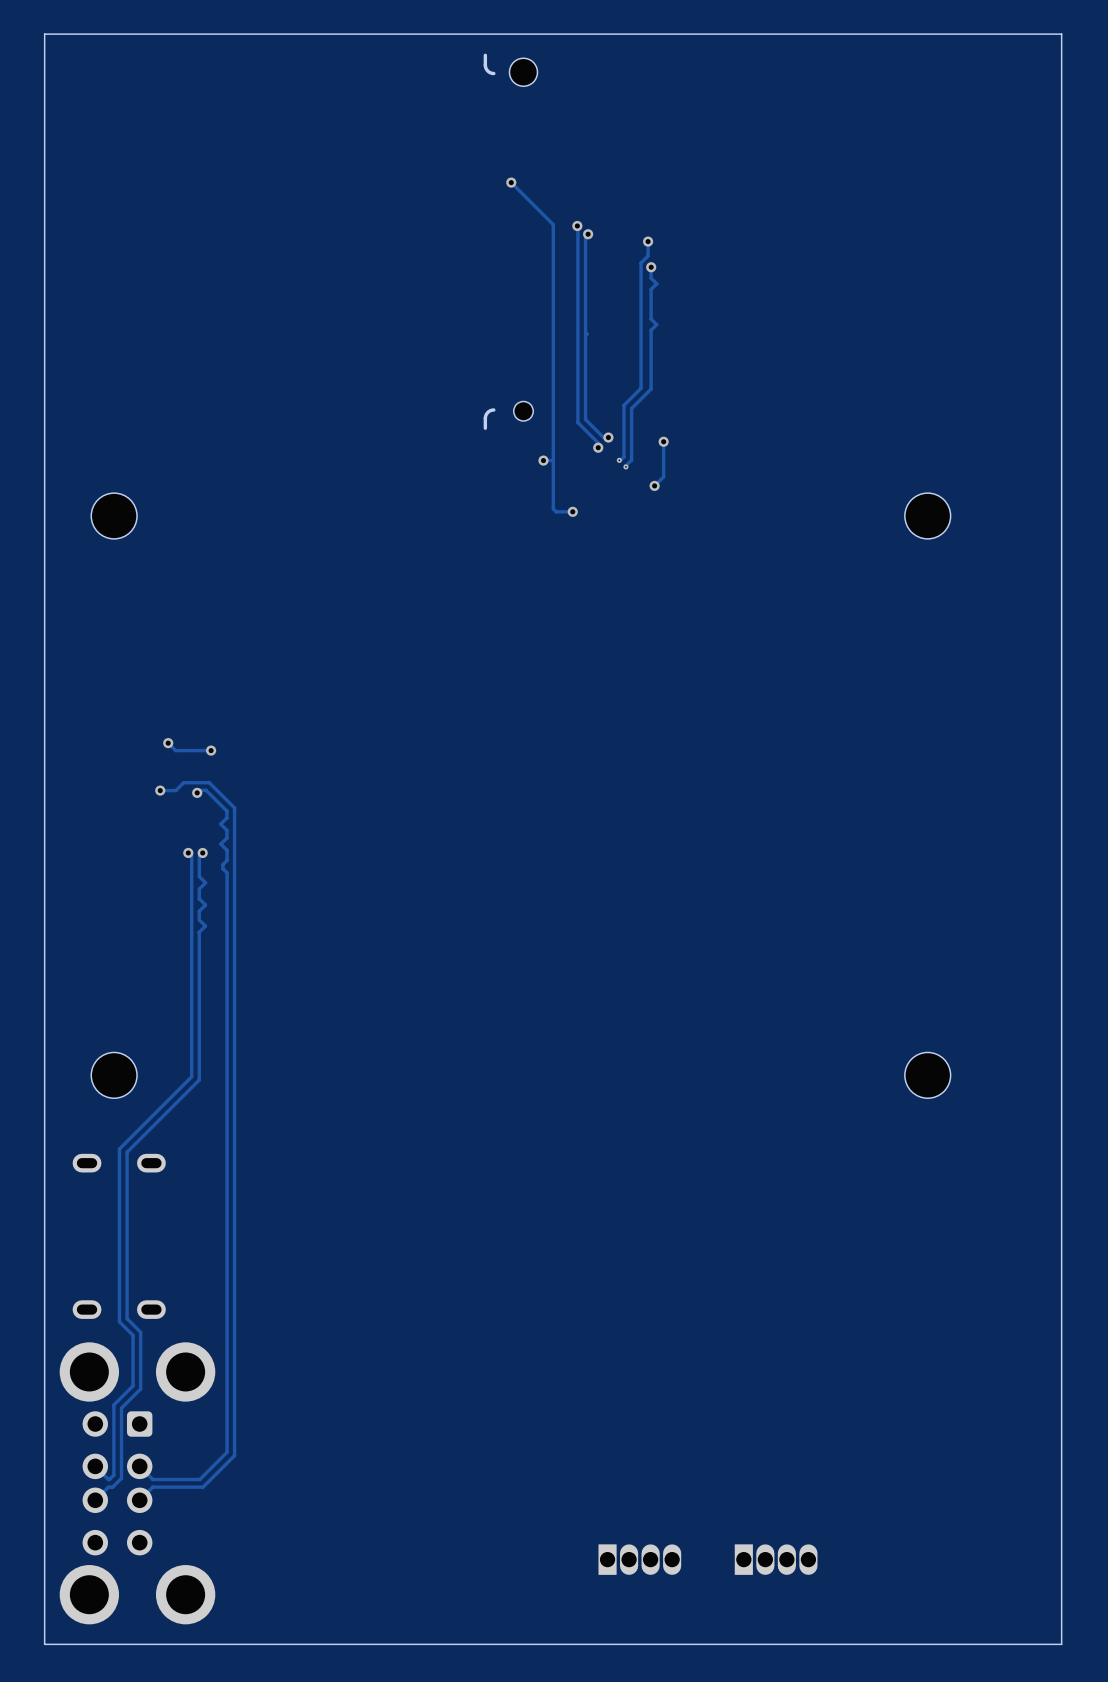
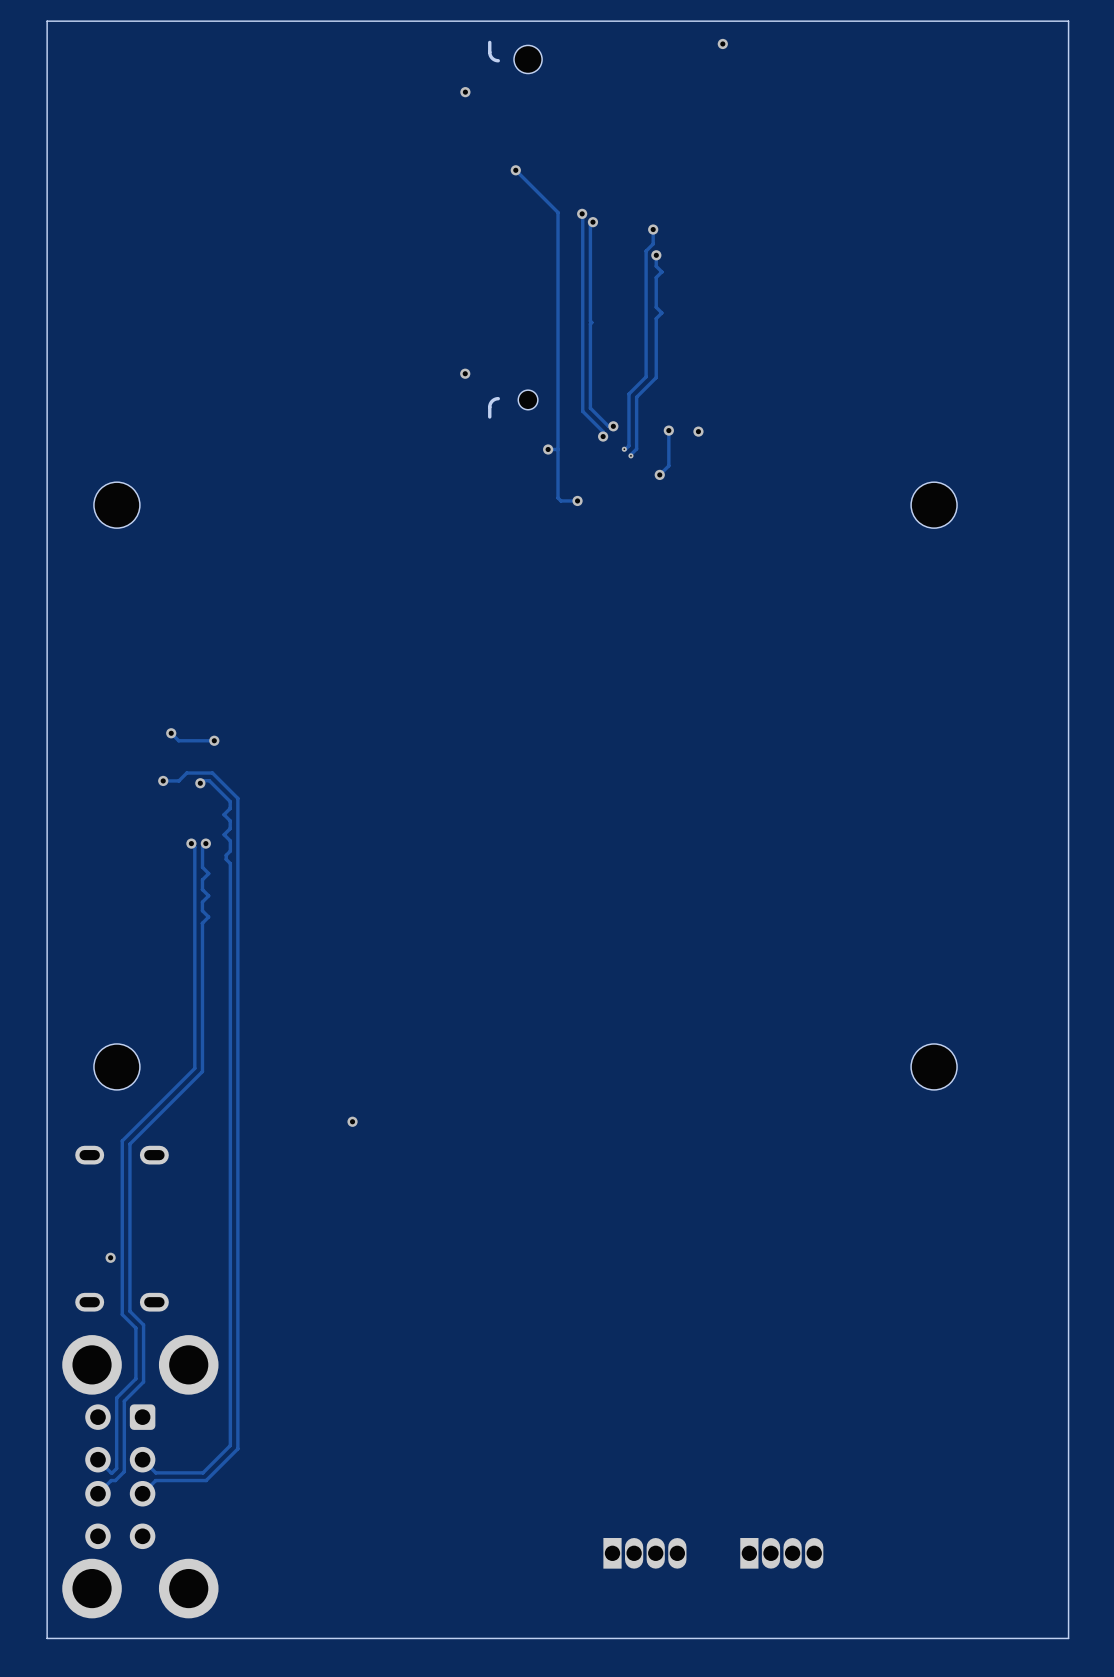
via: none -> (722, 43)
via: none -> (465, 92)
via: none -> (465, 373)
via: none -> (698, 431)
via: none -> (352, 1121)
via: none -> (110, 1257)

